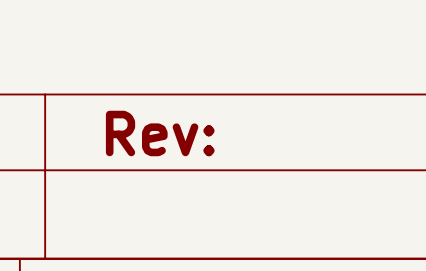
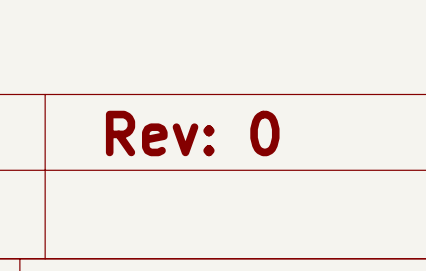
title block: Rev: (160, 133) -> Rev: 0 (192, 133)

